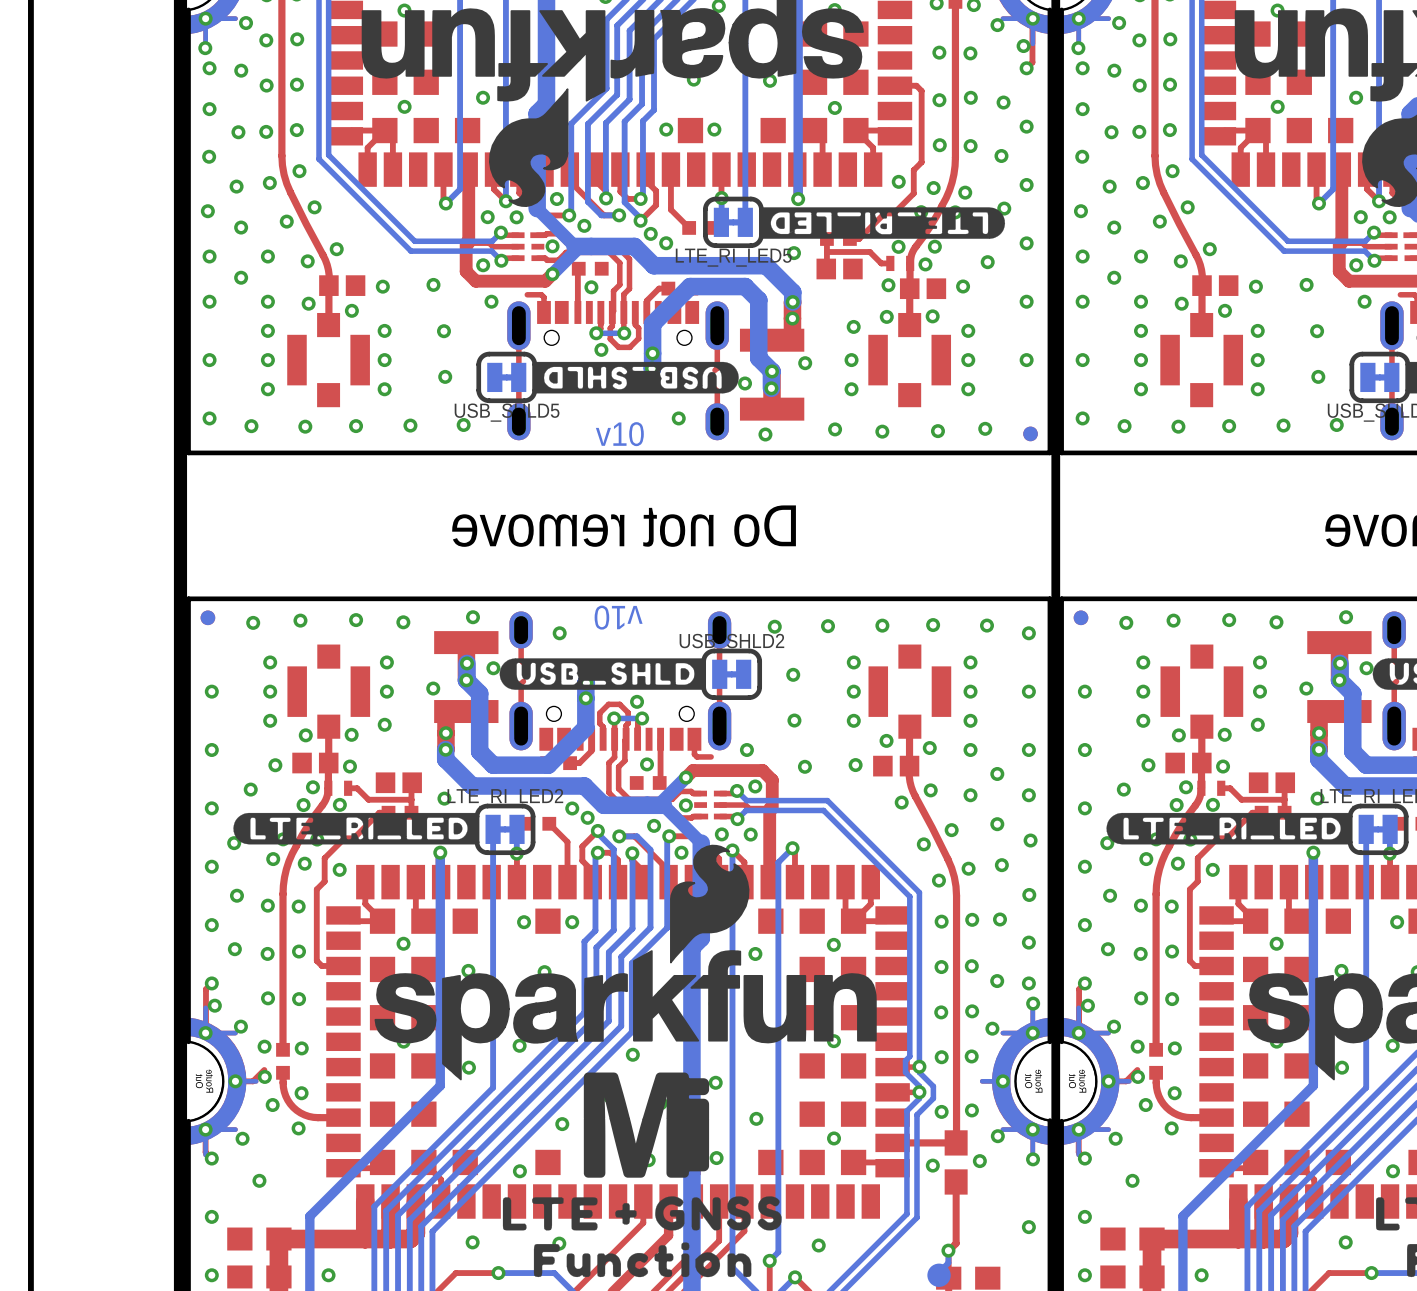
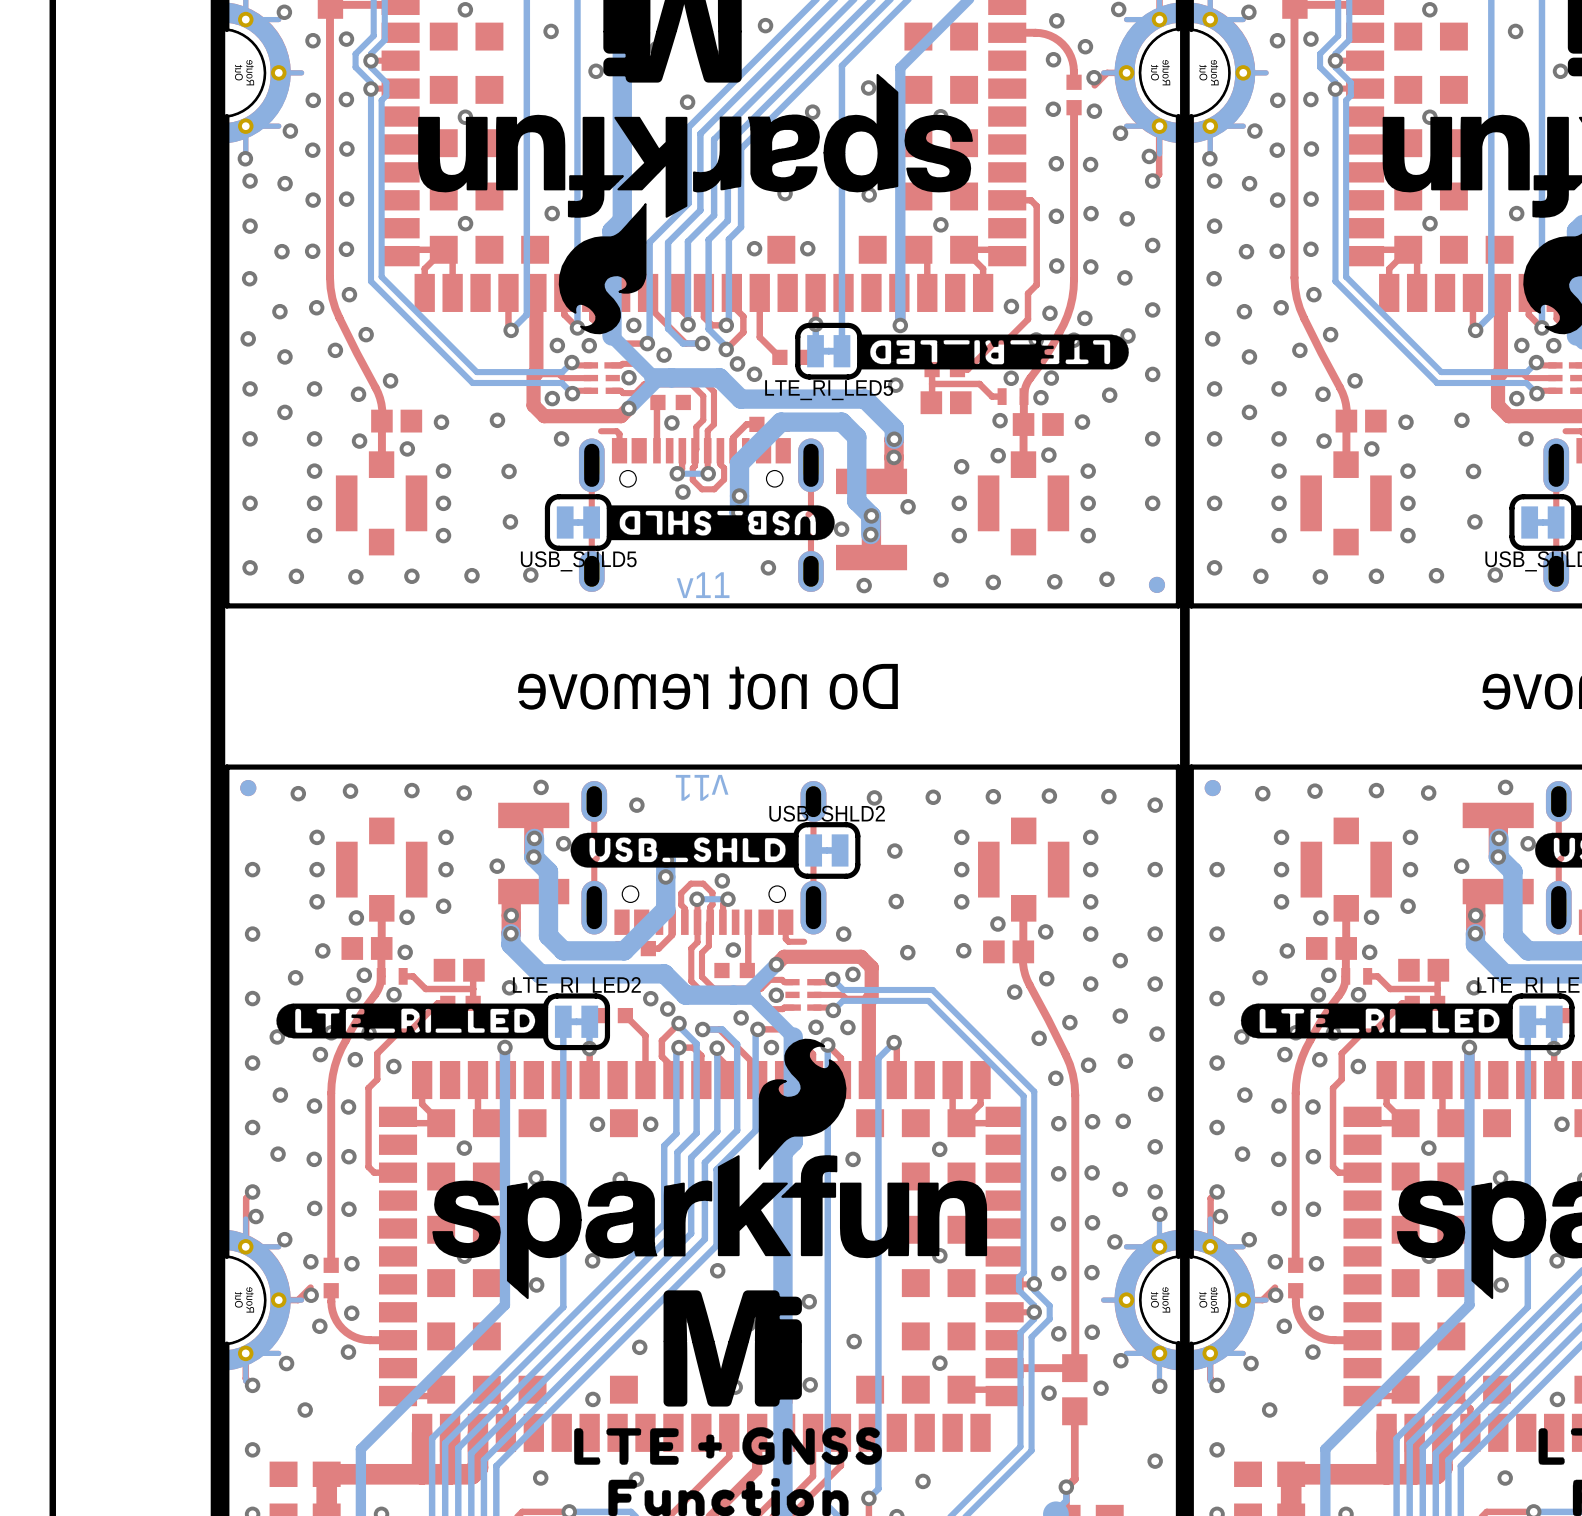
text: v10 (619, 434) -> v11 (703, 585)
text: v10 (618, 617) -> v11 (702, 787)

